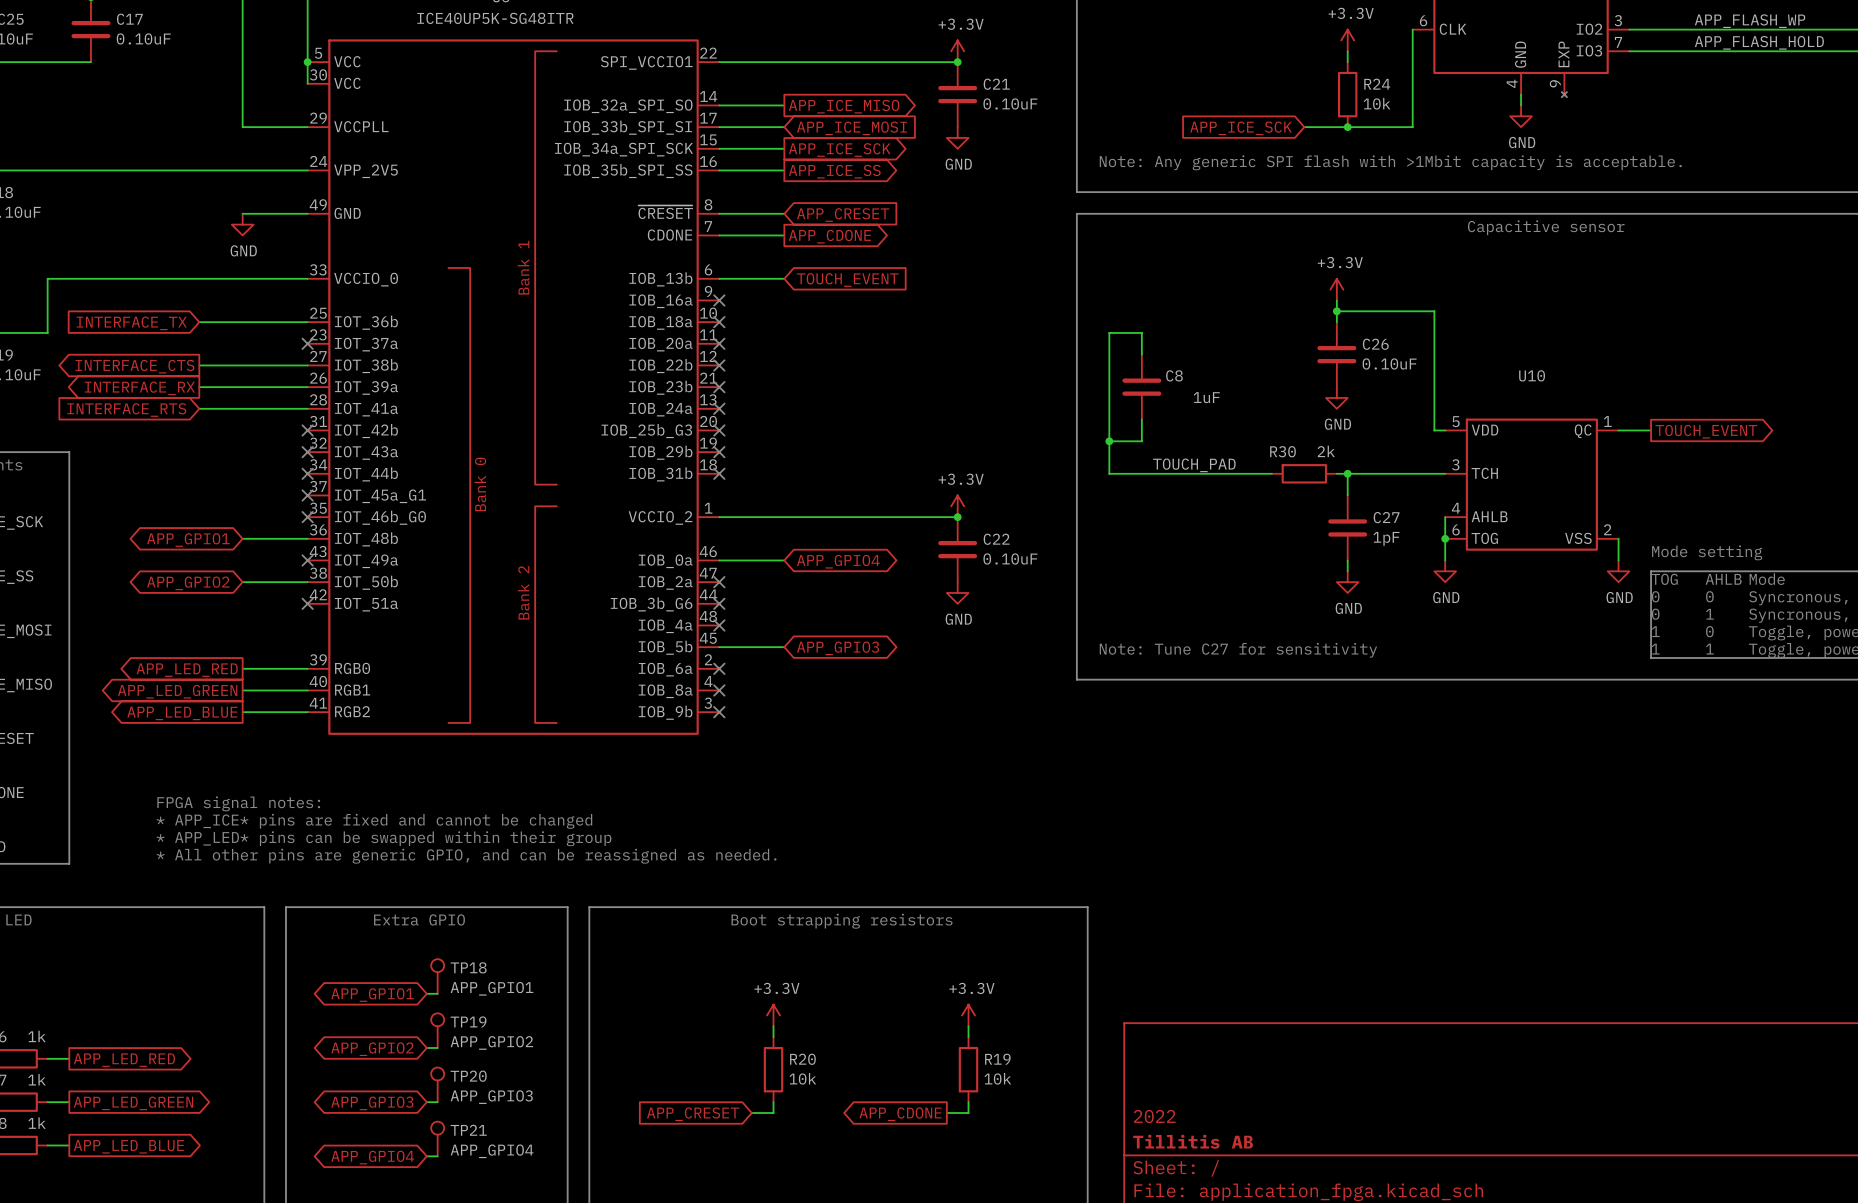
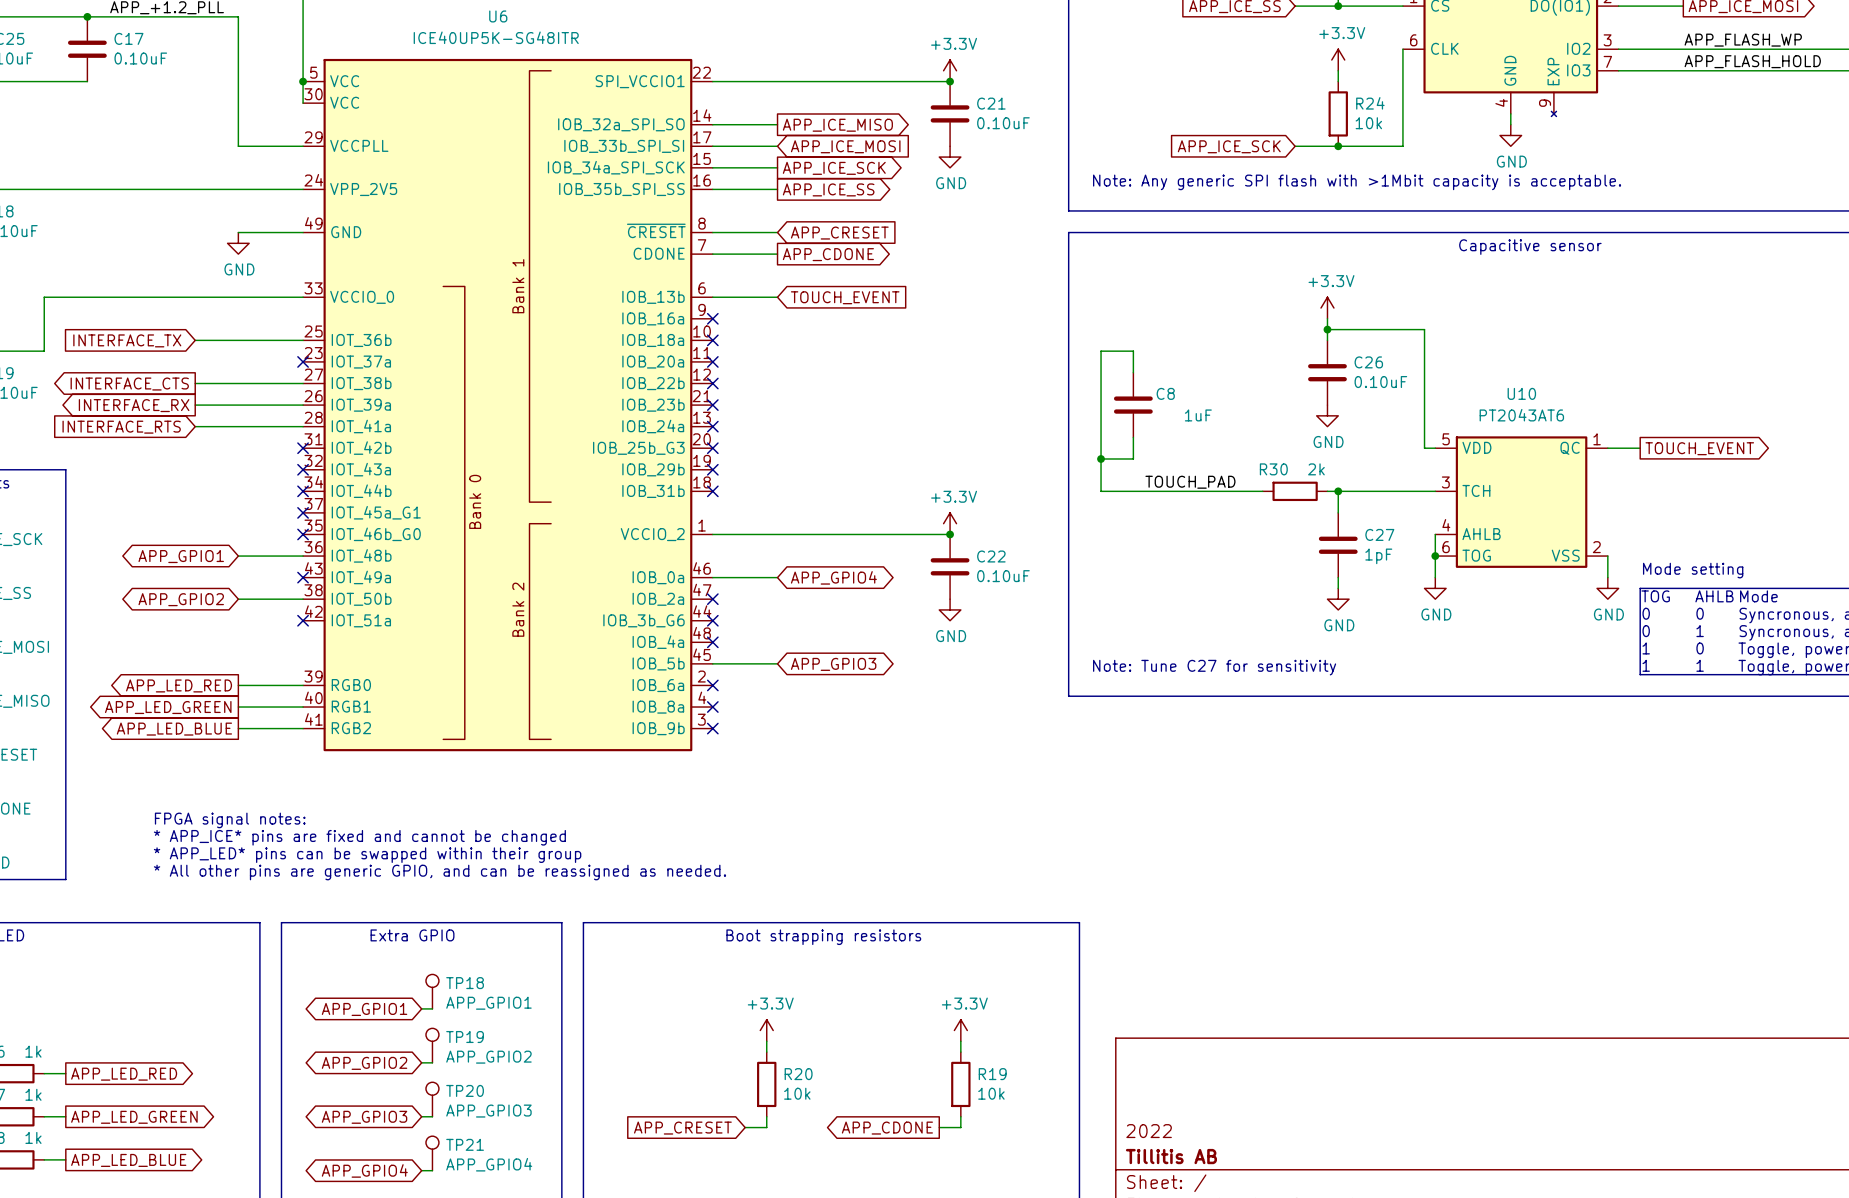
U10 value: none -> PT2043AT6 (1521, 415)

